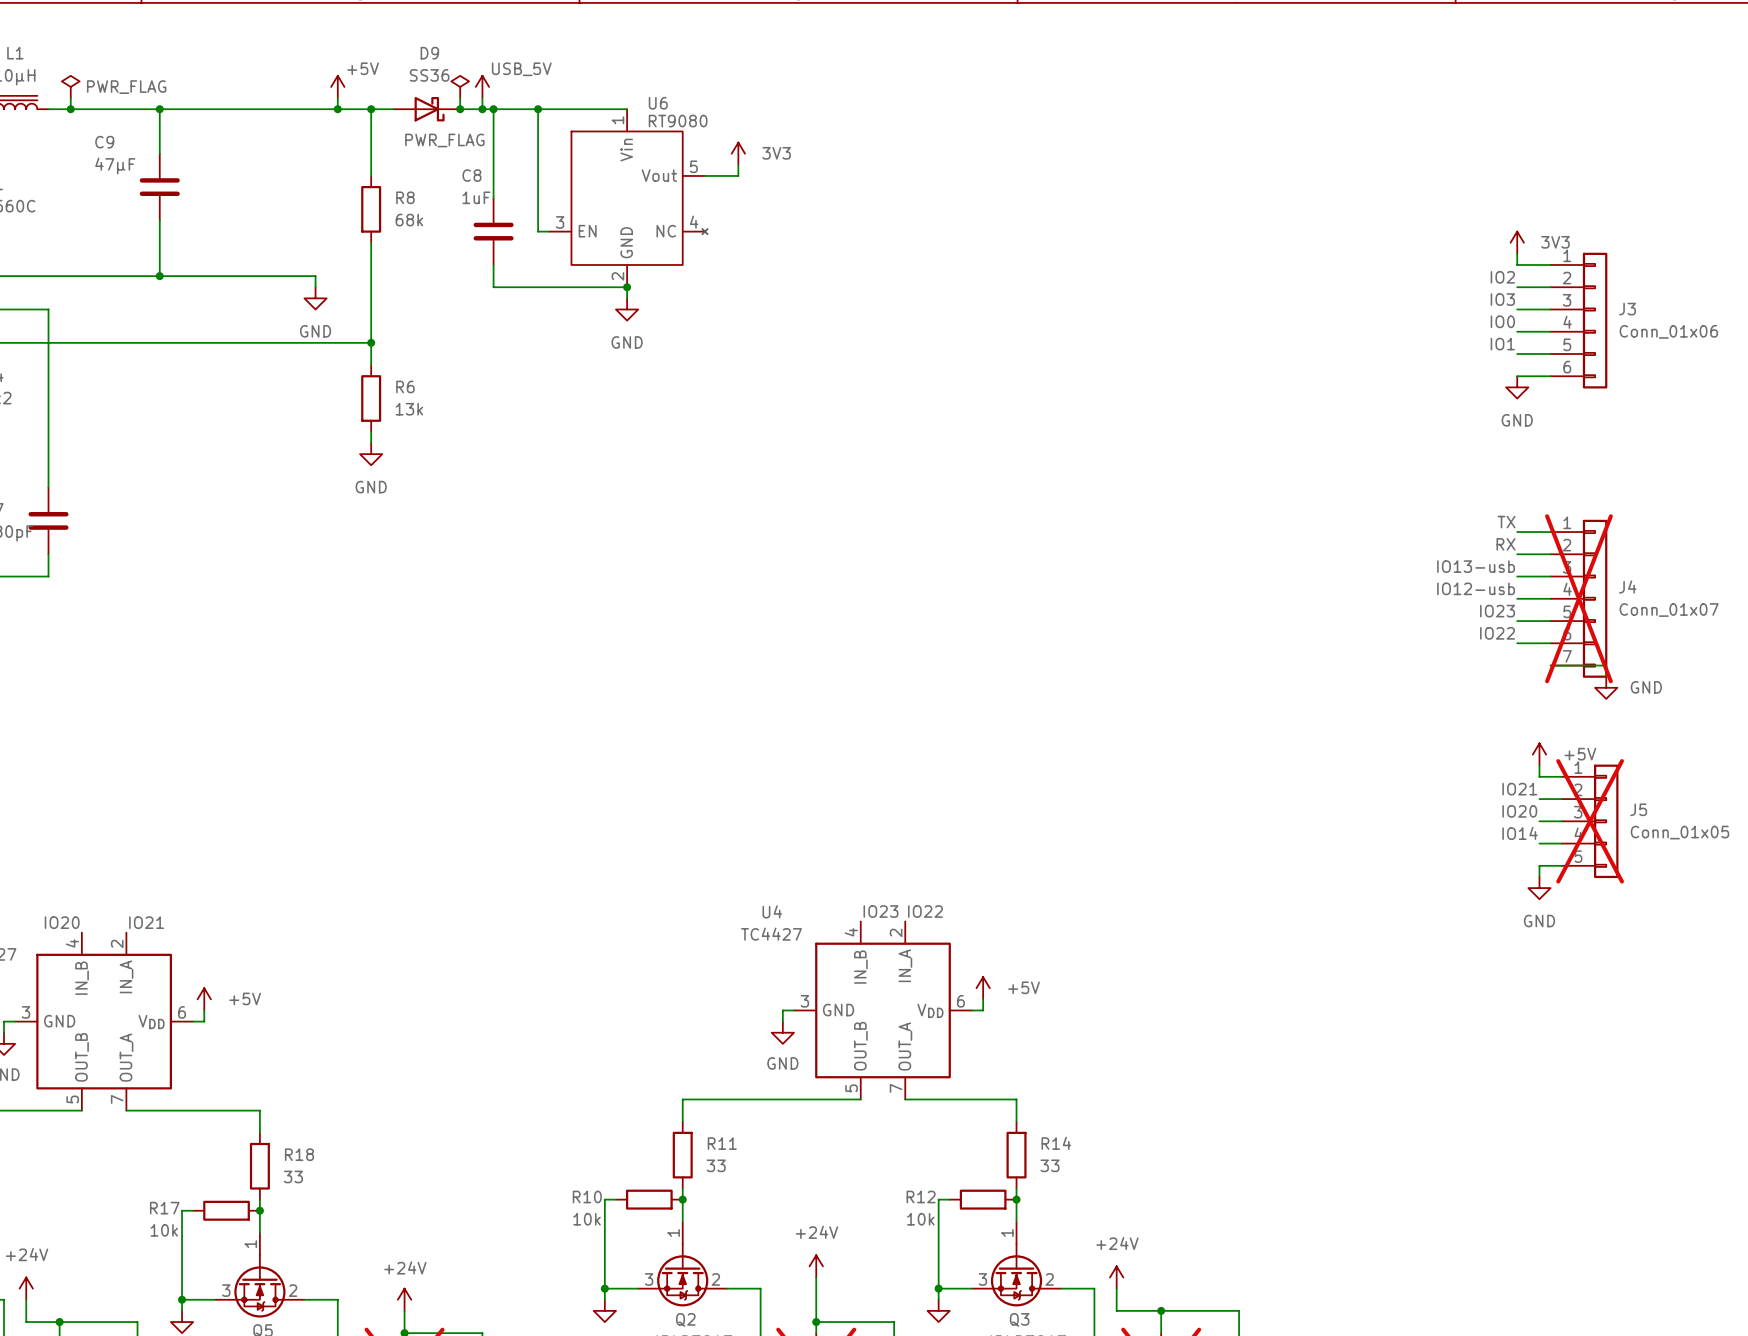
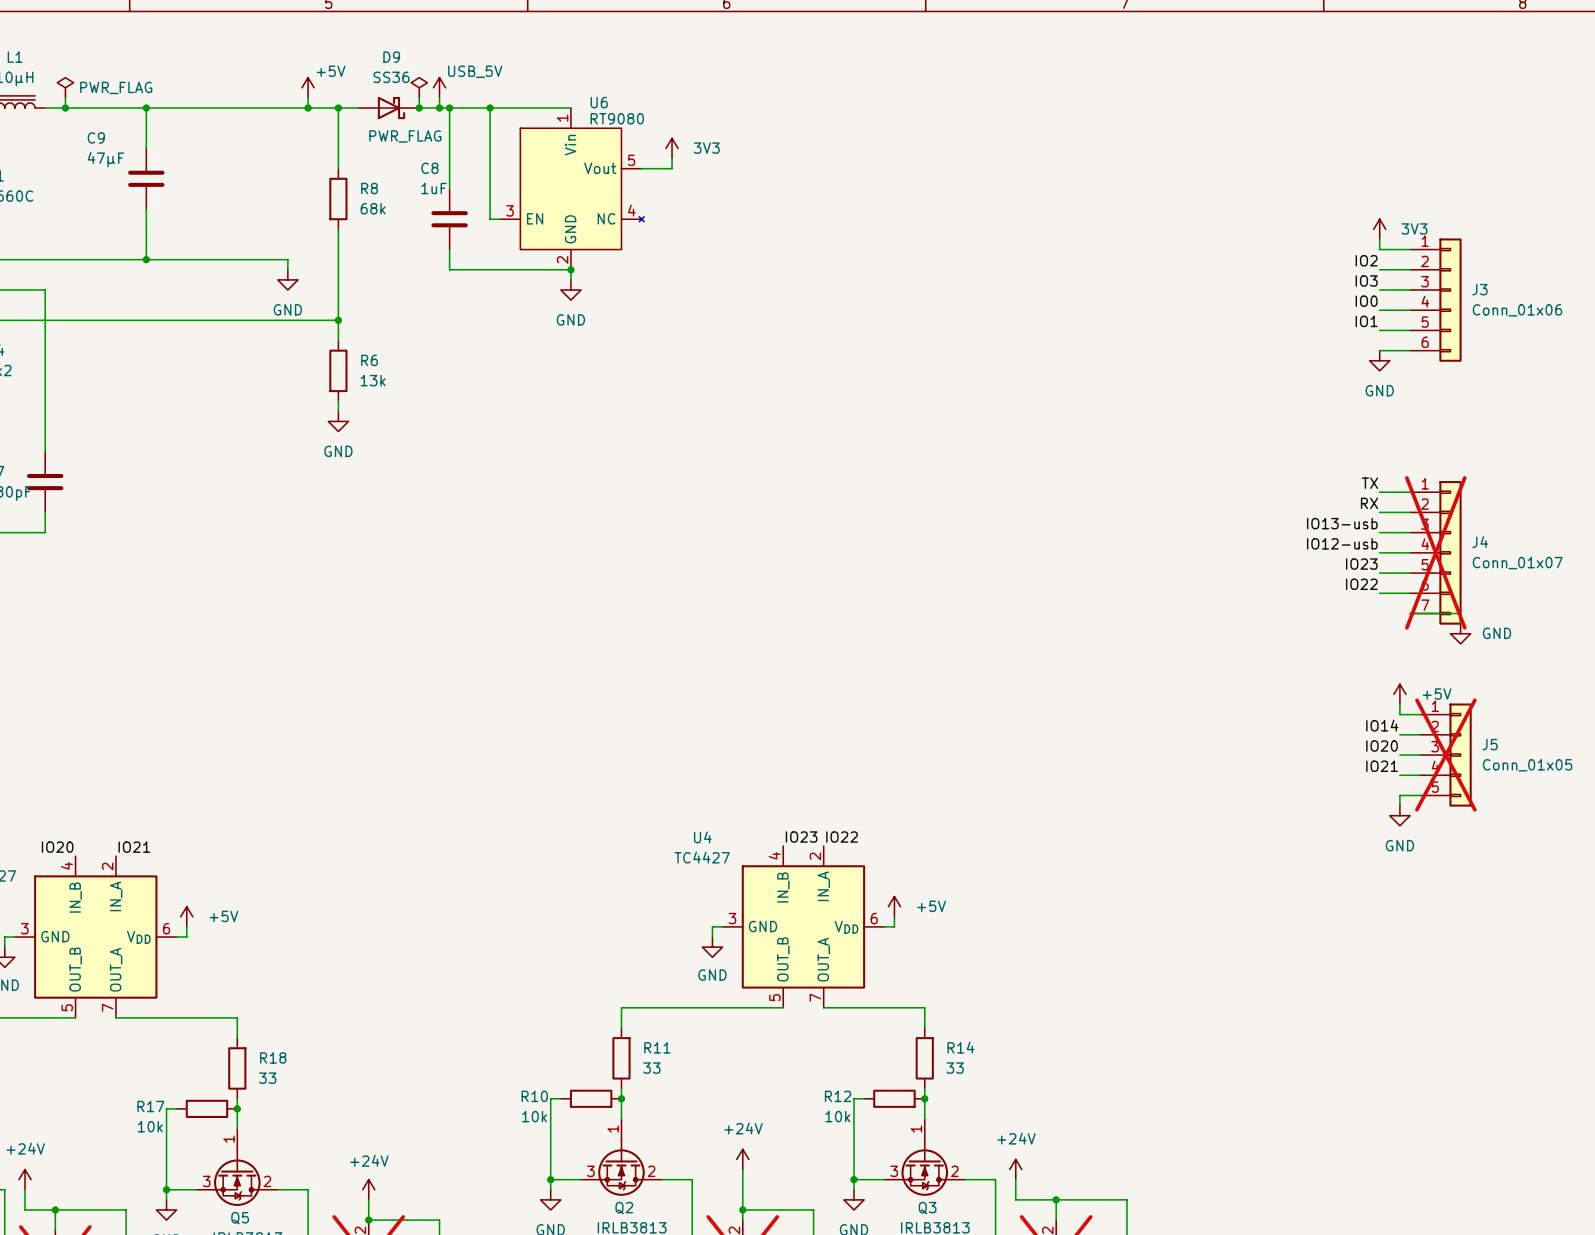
label: IO21 (1519, 789) -> IO14 (1382, 725)
label: IO14 (1520, 833) -> IO21 (1382, 766)

